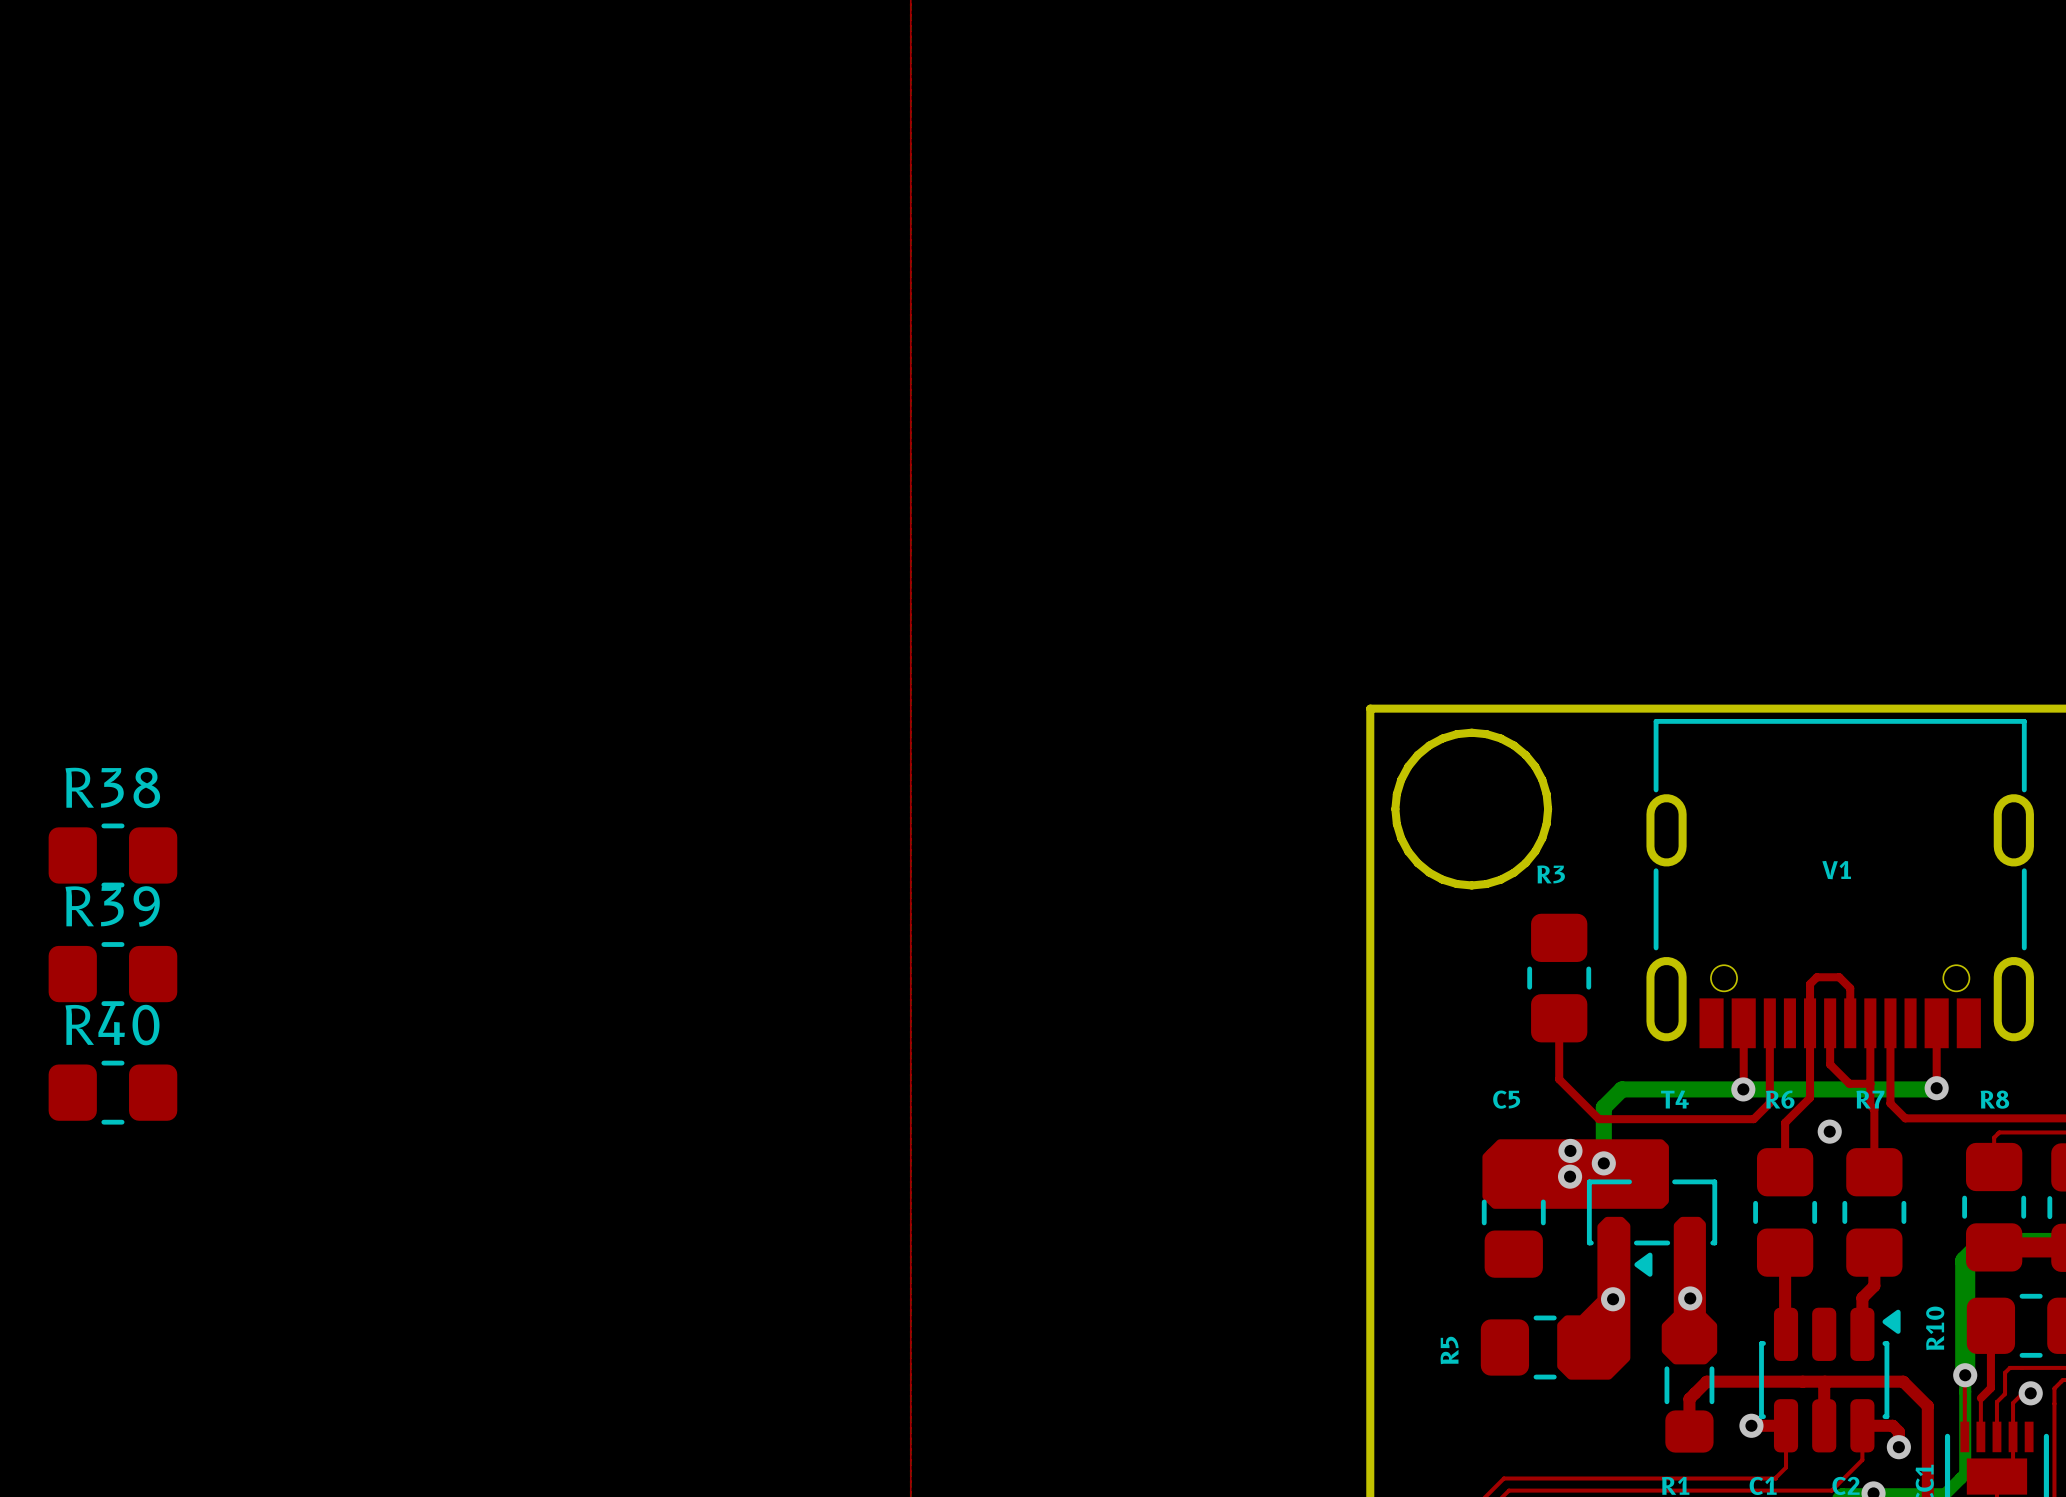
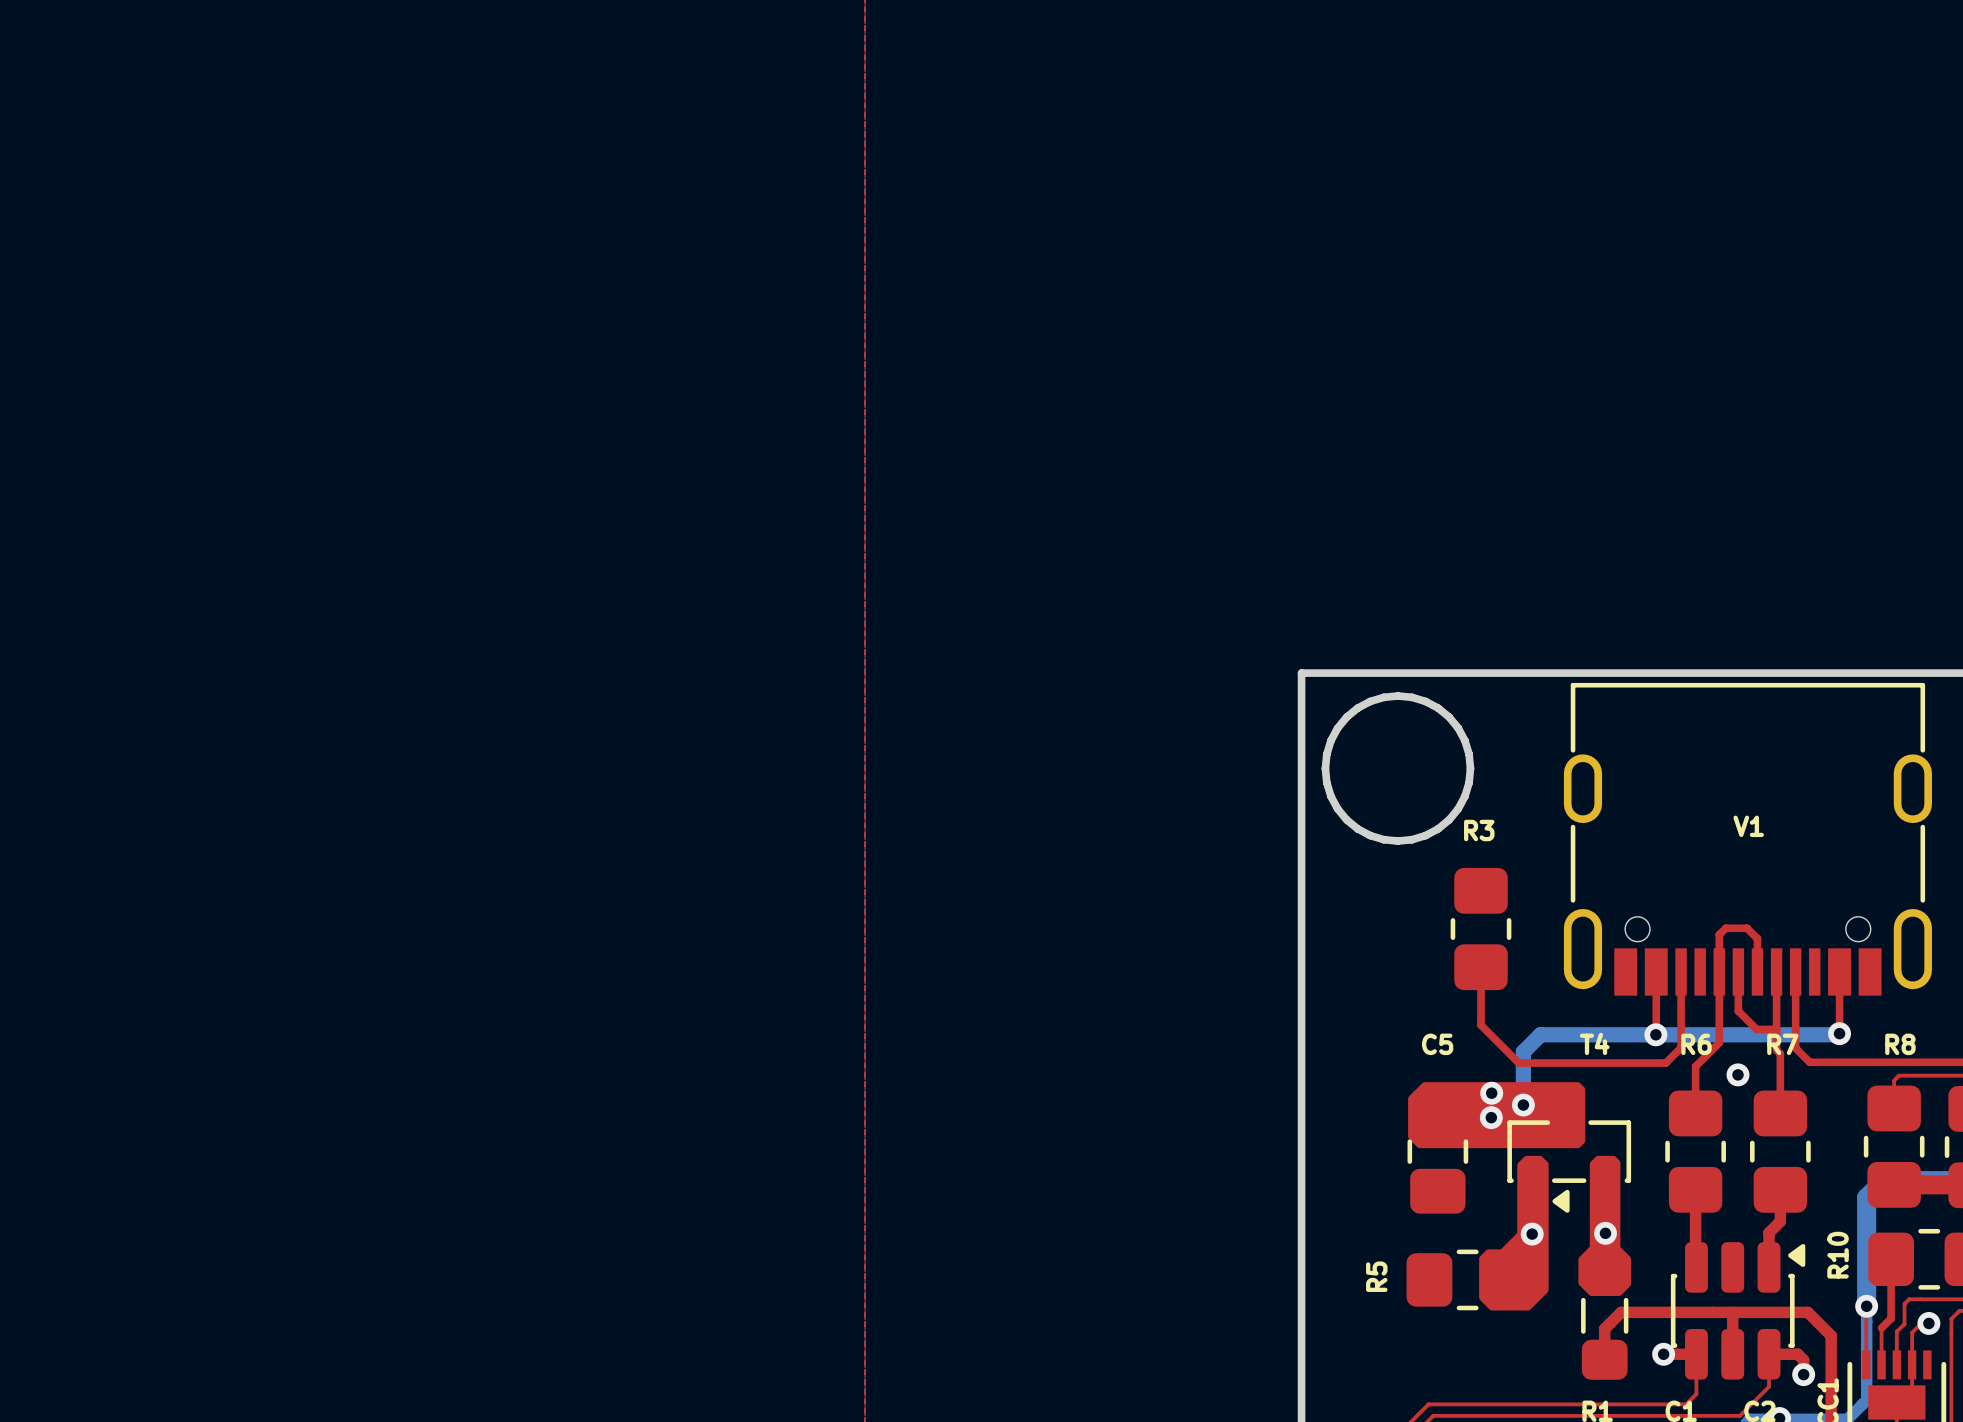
R38: (112, 855) -> none
R39: (112, 974) -> none
R40: (112, 1092) -> none

